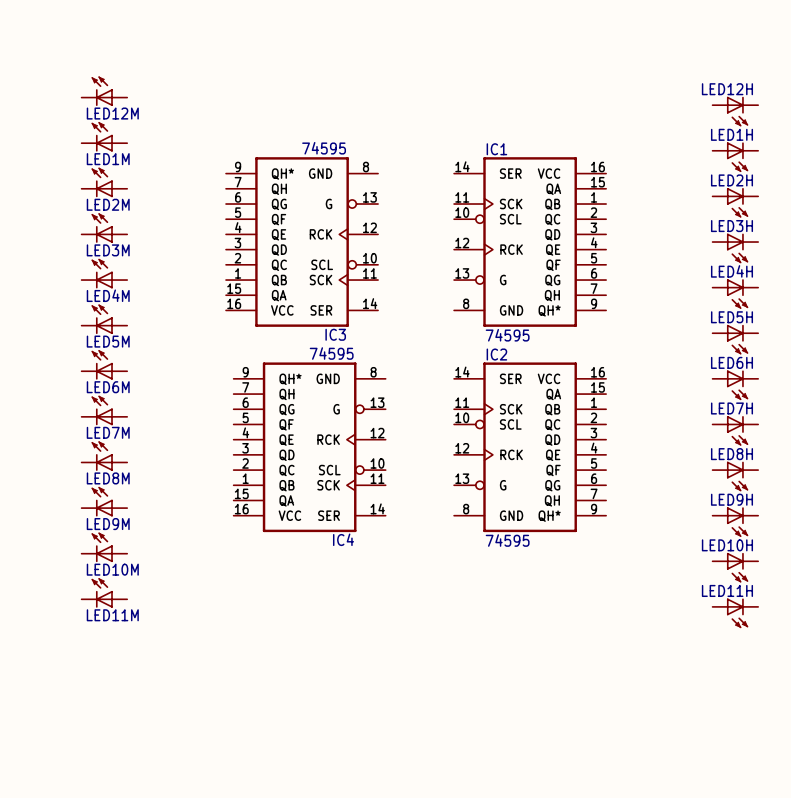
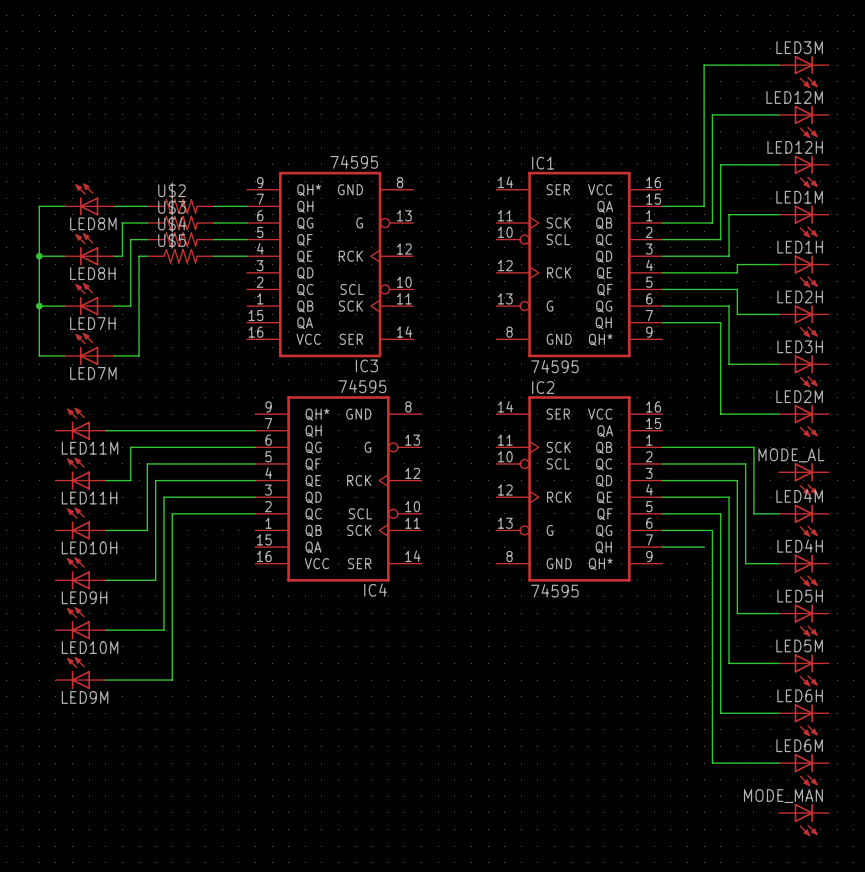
wire: none -> (778, 65) (704, 65) (704, 206) (662, 206)
LED12H name: LED12H (727, 89) -> LED12M (794, 97)
LED12M: (104, 91) -> none
wire: none -> (778, 114) (712, 114) (712, 222) (662, 222)
LED1H name: LED1H (731, 134) -> LED12H (795, 147)
LED1M: (104, 136) -> none
wire: none -> (778, 164) (720, 164) (720, 239) (662, 239)
LED2H name: LED2H (731, 180) -> LED1M (799, 197)
LED2M: (104, 182) -> none
wire: none -> (64, 206) (39, 206) (39, 355) (64, 355)
U$2: none -> (180, 206)
wire: none -> (213, 206) (247, 206)
wire: none -> (778, 214) (729, 214) (729, 256) (662, 256)
wire: none -> (147, 222) (122, 222) (122, 256) (114, 256)
U$3: none -> (180, 222)
wire: none -> (213, 222) (247, 222)
wire: none -> (147, 239) (130, 239) (130, 306) (114, 306)
U$4: none -> (180, 239)
wire: none -> (213, 239) (247, 239)
LED3H name: LED3H (731, 226) -> LED1H (800, 247)
LED8H: none -> (89, 249)
LED3M rotation: 0° (102, 228) -> 180° (806, 72)
LED3M position: (104, 228) -> (803, 72)
wire: none -> (39, 256) (64, 256)
junction: none -> (39, 256)
wire: none -> (147, 256) (139, 256) (139, 355) (114, 355)
U$5: none -> (180, 256)
wire: none -> (213, 256) (247, 256)
wire: none -> (778, 264) (737, 264) (737, 272) (662, 272)
wire: none -> (662, 289) (737, 289) (737, 314) (778, 314)
LED4H name: LED4H (731, 271) -> LED2H (800, 296)
LED4M: (104, 273) -> none
wire: none -> (39, 306) (64, 306)
junction: none -> (39, 306)
wire: none -> (662, 306) (729, 306) (729, 364) (778, 364)
wire: none -> (662, 322) (720, 322) (720, 414) (778, 414)
LED5H name: LED5H (731, 317) -> LED3H (800, 346)
LED5M: (104, 319) -> none
LED6H name: LED6H (731, 362) -> LED2M (799, 396)
LED6M rotation: 0° (102, 364) -> 180° (806, 770)
LED6M position: (104, 364) -> (803, 770)
wire: none -> (105, 430) (255, 430)
wire: none -> (255, 447) (130, 447) (130, 480) (105, 480)
wire: none -> (662, 447) (753, 447) (753, 513) (778, 513)
LED7M position: (104, 410) -> (89, 349)
wire: none -> (255, 463) (147, 463) (147, 530) (105, 530)
wire: none -> (662, 463) (745, 463) (745, 563) (778, 563)
LED7H position: (735, 430) -> (89, 299)
LED7H rotation: 0° (737, 430) -> 180° (86, 299)
LED11H: none -> (80, 473)
MODE_AL: none -> (803, 479)
wire: none -> (255, 480) (155, 480) (155, 580) (105, 580)
wire: none -> (662, 480) (737, 480) (737, 613) (778, 613)
wire: none -> (255, 497) (163, 497) (163, 630) (105, 630)
wire: none -> (662, 497) (729, 497) (729, 663) (778, 663)
LED8H name: LED8H (731, 454) -> LED4M (799, 496)
LED8M position: (104, 456) -> (89, 199)
wire: none -> (255, 513) (172, 513) (172, 680) (105, 680)
wire: none -> (662, 513) (720, 513) (720, 713) (778, 713)
LED10H: none -> (80, 523)
wire: none -> (662, 530) (712, 530) (712, 763) (778, 763)
LED9H name: LED9H (731, 499) -> LED4H (800, 545)
wire: none -> (662, 547) (704, 547)
LED9M position: (104, 501) -> (80, 673)
LED9H: none -> (80, 573)
LED10H name: LED10H (727, 545) -> LED5H (800, 596)
LED10M position: (104, 547) -> (80, 623)
LED11H name: LED11H (727, 590) -> LED5M (799, 645)
LED11M position: (104, 593) -> (80, 423)
LED6H: none -> (803, 720)
MODE_MAN: none -> (803, 819)

